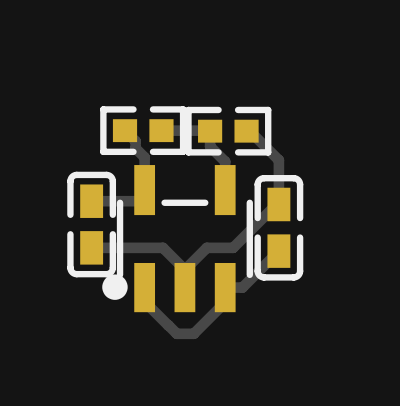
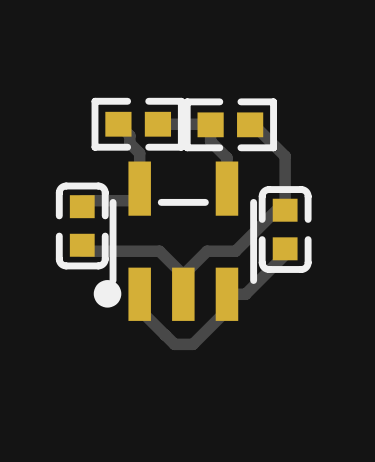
part footprint: [67, 171, 117, 278] -> [55, 182, 109, 270]
part footprint: [254, 175, 304, 281] -> [258, 186, 312, 273]

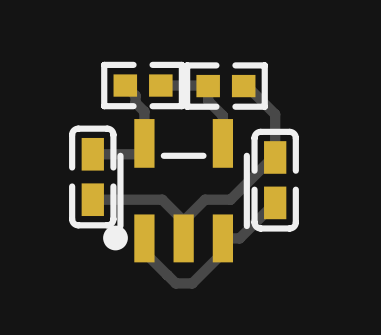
part footprint: [55, 182, 109, 270] -> [69, 125, 117, 229]
part footprint: [258, 186, 312, 273] -> [251, 128, 299, 232]

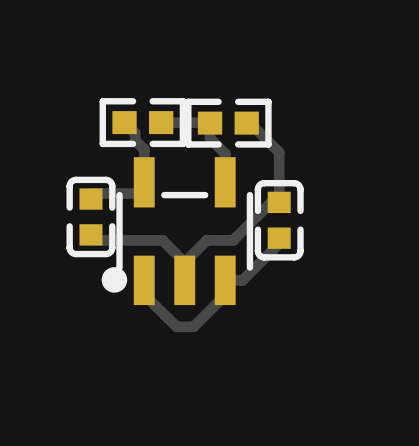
part footprint: [69, 125, 117, 229] -> [66, 176, 116, 258]
part footprint: [251, 128, 299, 232] -> [254, 179, 304, 261]

